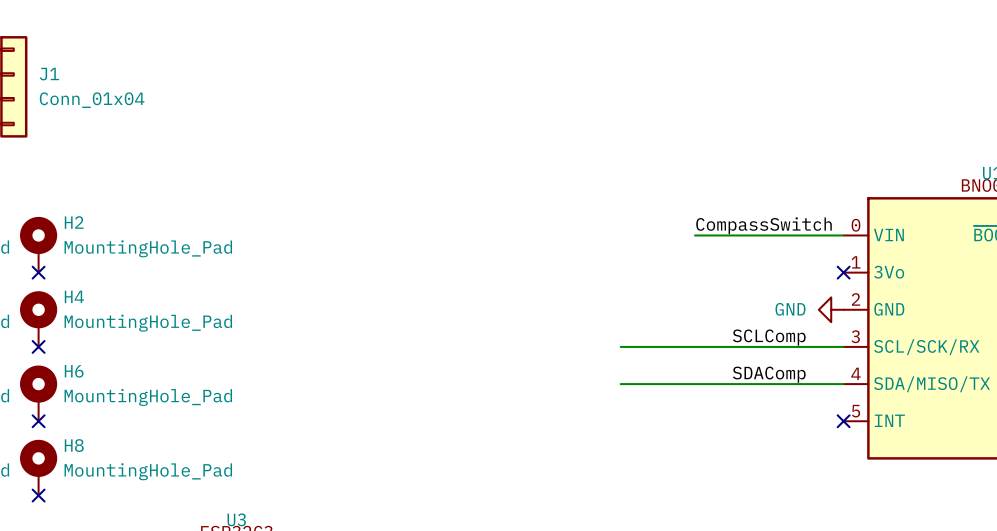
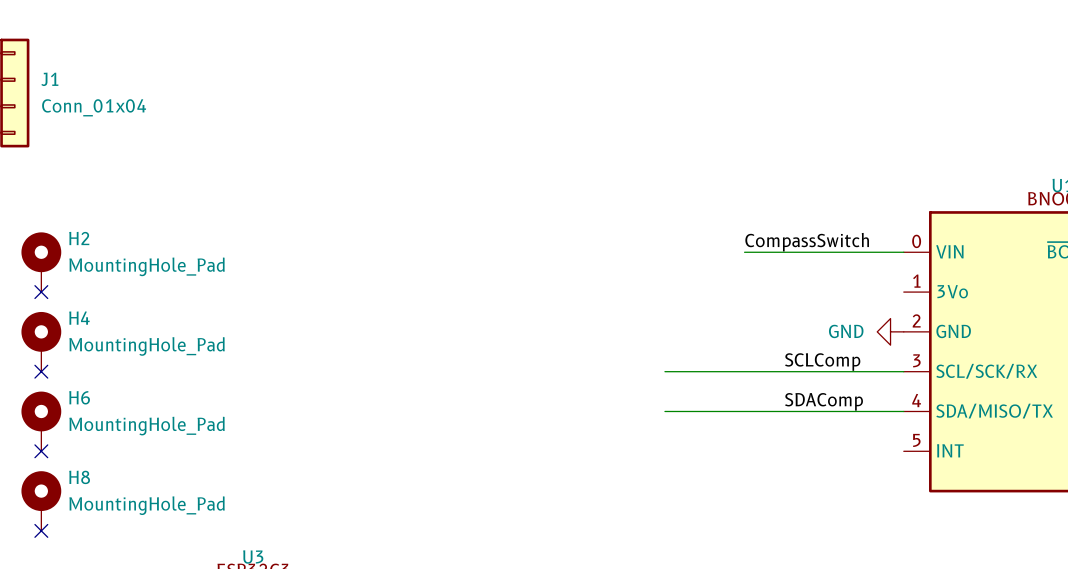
no-connect mark: (843, 272) -> none
no-connect mark: (843, 421) -> none

